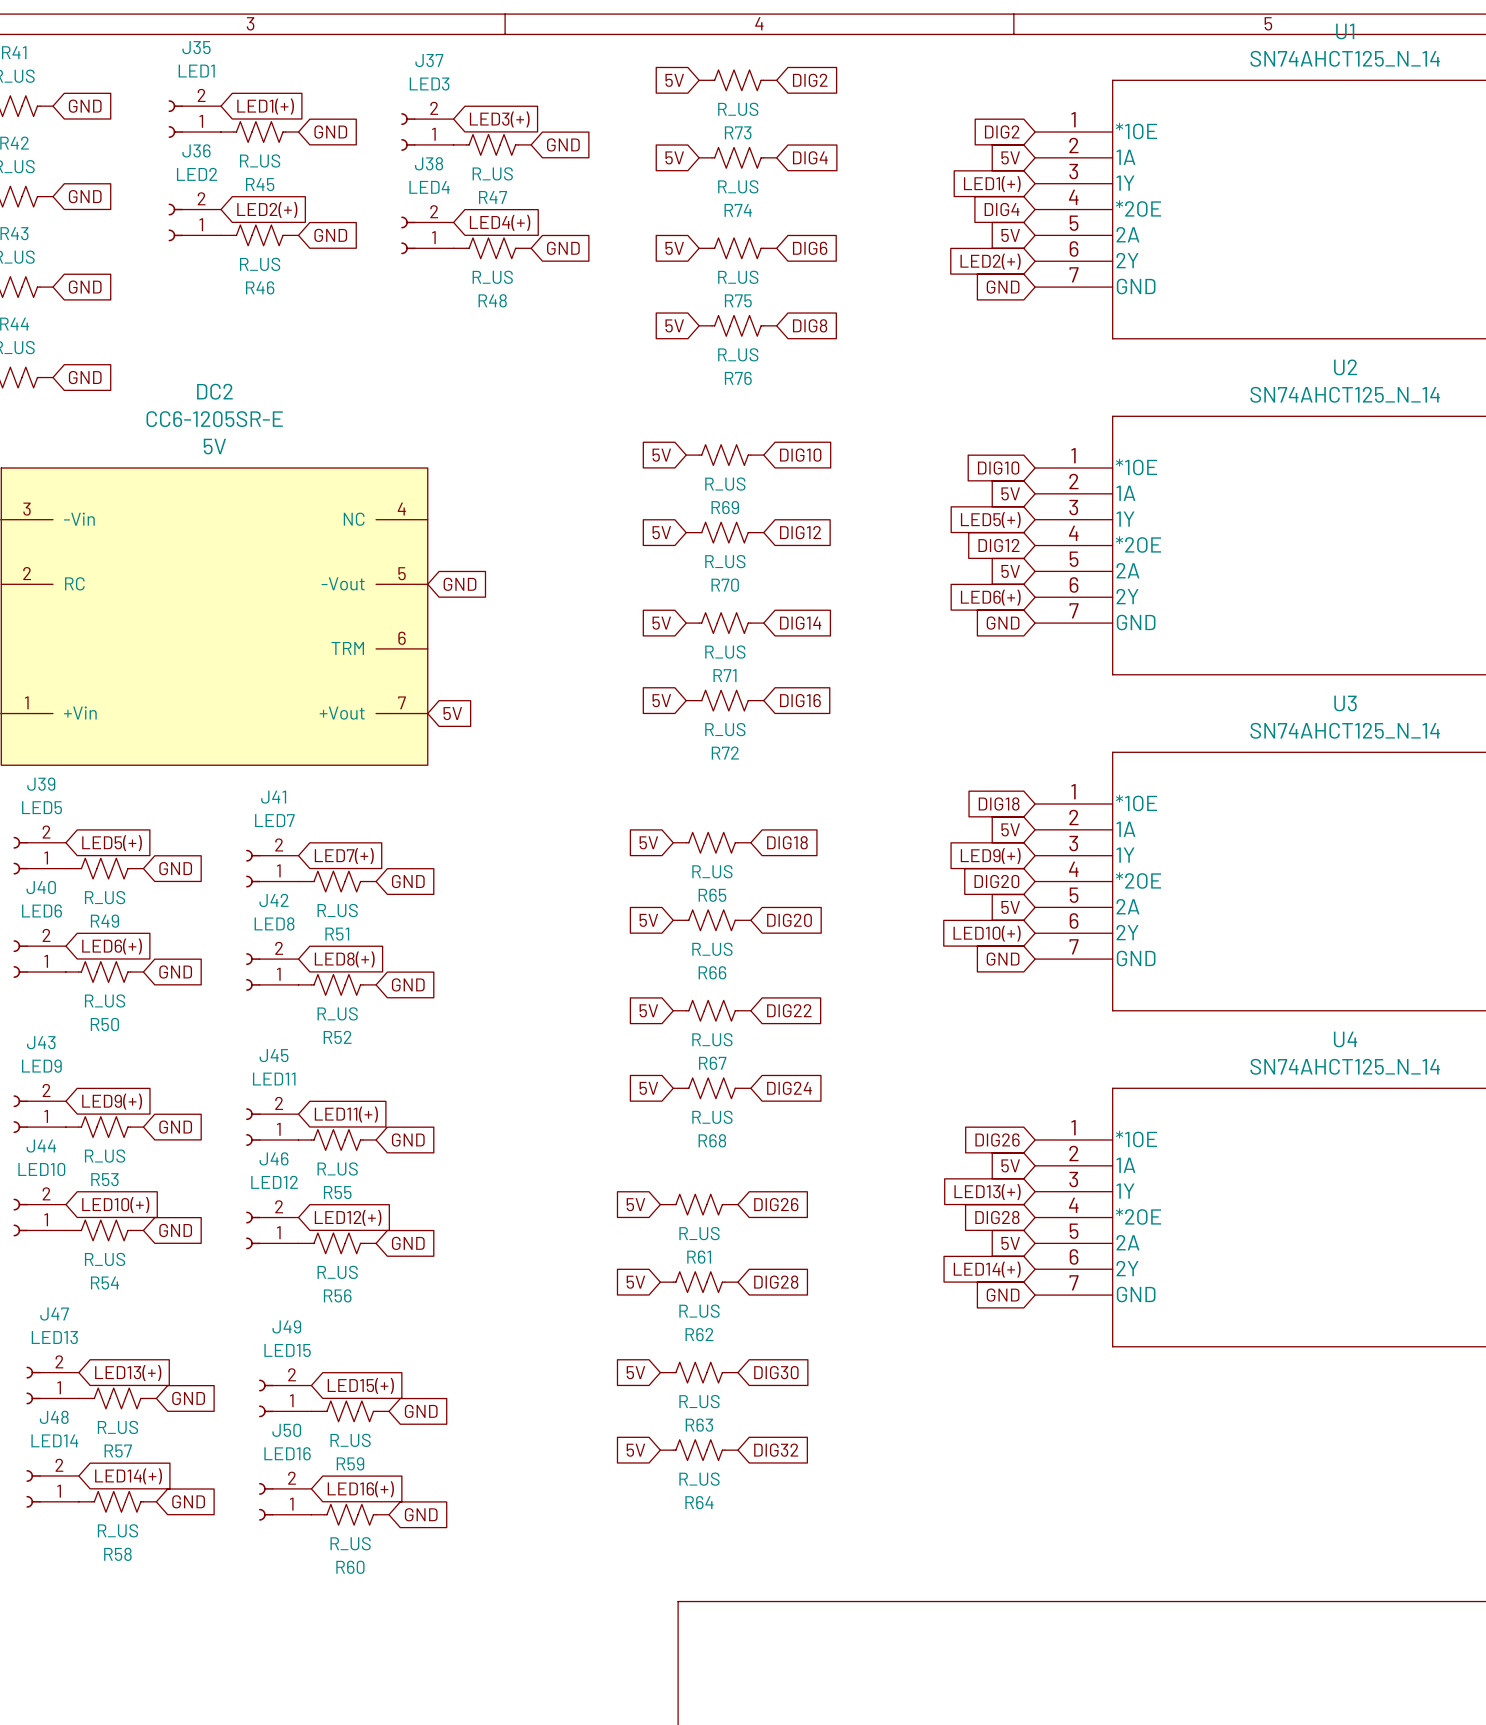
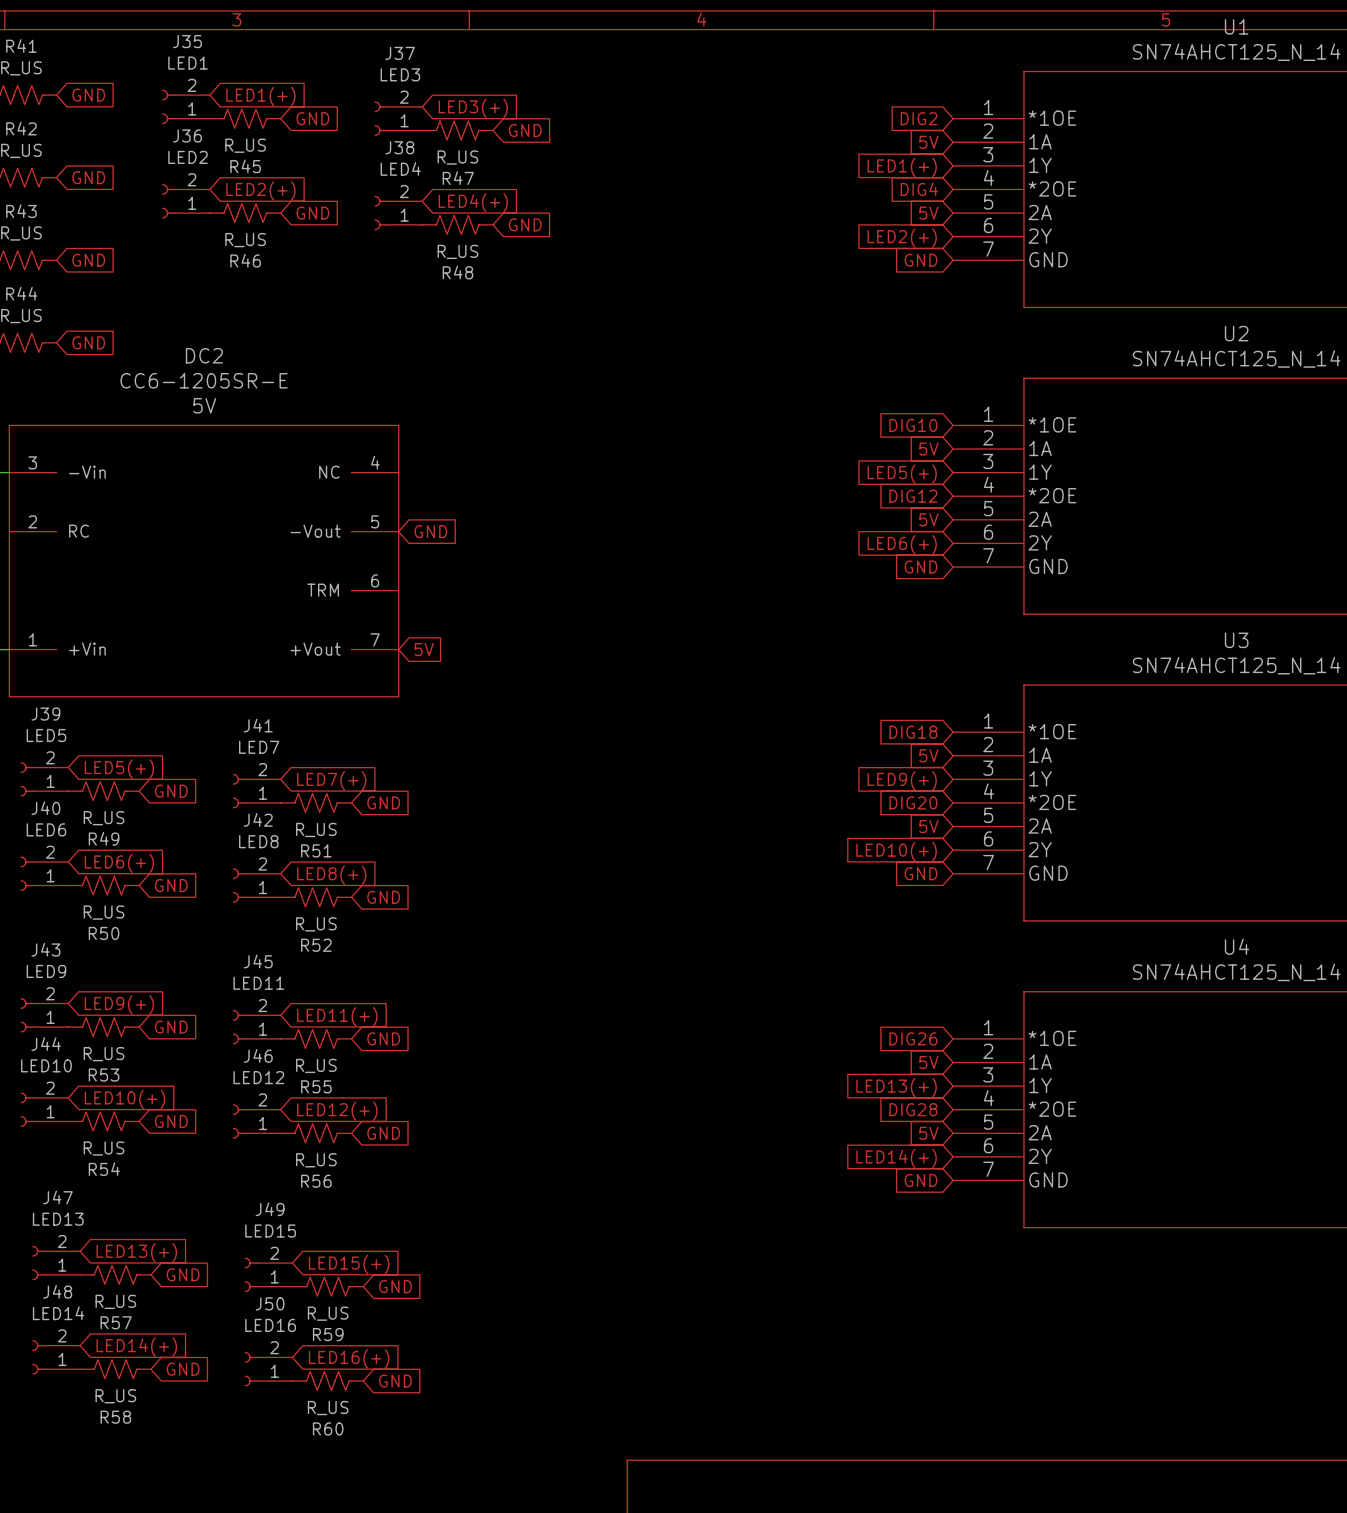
global label: 5V (674, 80) -> none
R73: R_US (737, 80) -> none
global label: DIG2 (810, 80) -> none
global label: 5V (674, 157) -> none
R74: R_US (737, 157) -> none
global label: DIG4 (810, 157) -> none
global label: 5V (674, 248) -> none
R75: R_US (737, 248) -> none
global label: DIG6 (810, 248) -> none
global label: 5V (674, 325) -> none
R76: R_US (737, 325) -> none
global label: DIG8 (810, 325) -> none
global label: 5V (661, 455) -> none
R69: R_US (724, 455) -> none
global label: DIG10 (800, 455) -> none
global label: 5V (661, 532) -> none
R70: R_US (724, 532) -> none
global label: DIG12 (800, 532) -> none
global label: 5V (661, 623) -> none
R71: R_US (724, 623) -> none
global label: DIG14 (800, 623) -> none
global label: 5V (661, 700) -> none
R72: R_US (724, 700) -> none
global label: DIG16 (800, 700) -> none
global label: 5V (648, 842) -> none
R65: R_US (712, 842) -> none
global label: DIG18 (787, 842) -> none
global label: 5V (648, 920) -> none
R66: R_US (712, 920) -> none
global label: DIG20 (789, 920) -> none
global label: 5V (648, 1010) -> none
R67: R_US (712, 1010) -> none
global label: DIG22 (789, 1010) -> none
global label: 5V (648, 1088) -> none
R68: R_US (712, 1088) -> none
global label: DIG24 (789, 1088) -> none
global label: 5V (635, 1204) -> none
R61: R_US (699, 1204) -> none
global label: DIG26 (776, 1204) -> none
global label: 5V (635, 1282) -> none
R62: R_US (699, 1282) -> none
global label: DIG28 (776, 1282) -> none
global label: 5V (635, 1372) -> none
R63: R_US (699, 1372) -> none
global label: DIG30 (776, 1372) -> none
global label: 5V (635, 1450) -> none
R64: R_US (699, 1450) -> none
global label: DIG32 (776, 1450) -> none

